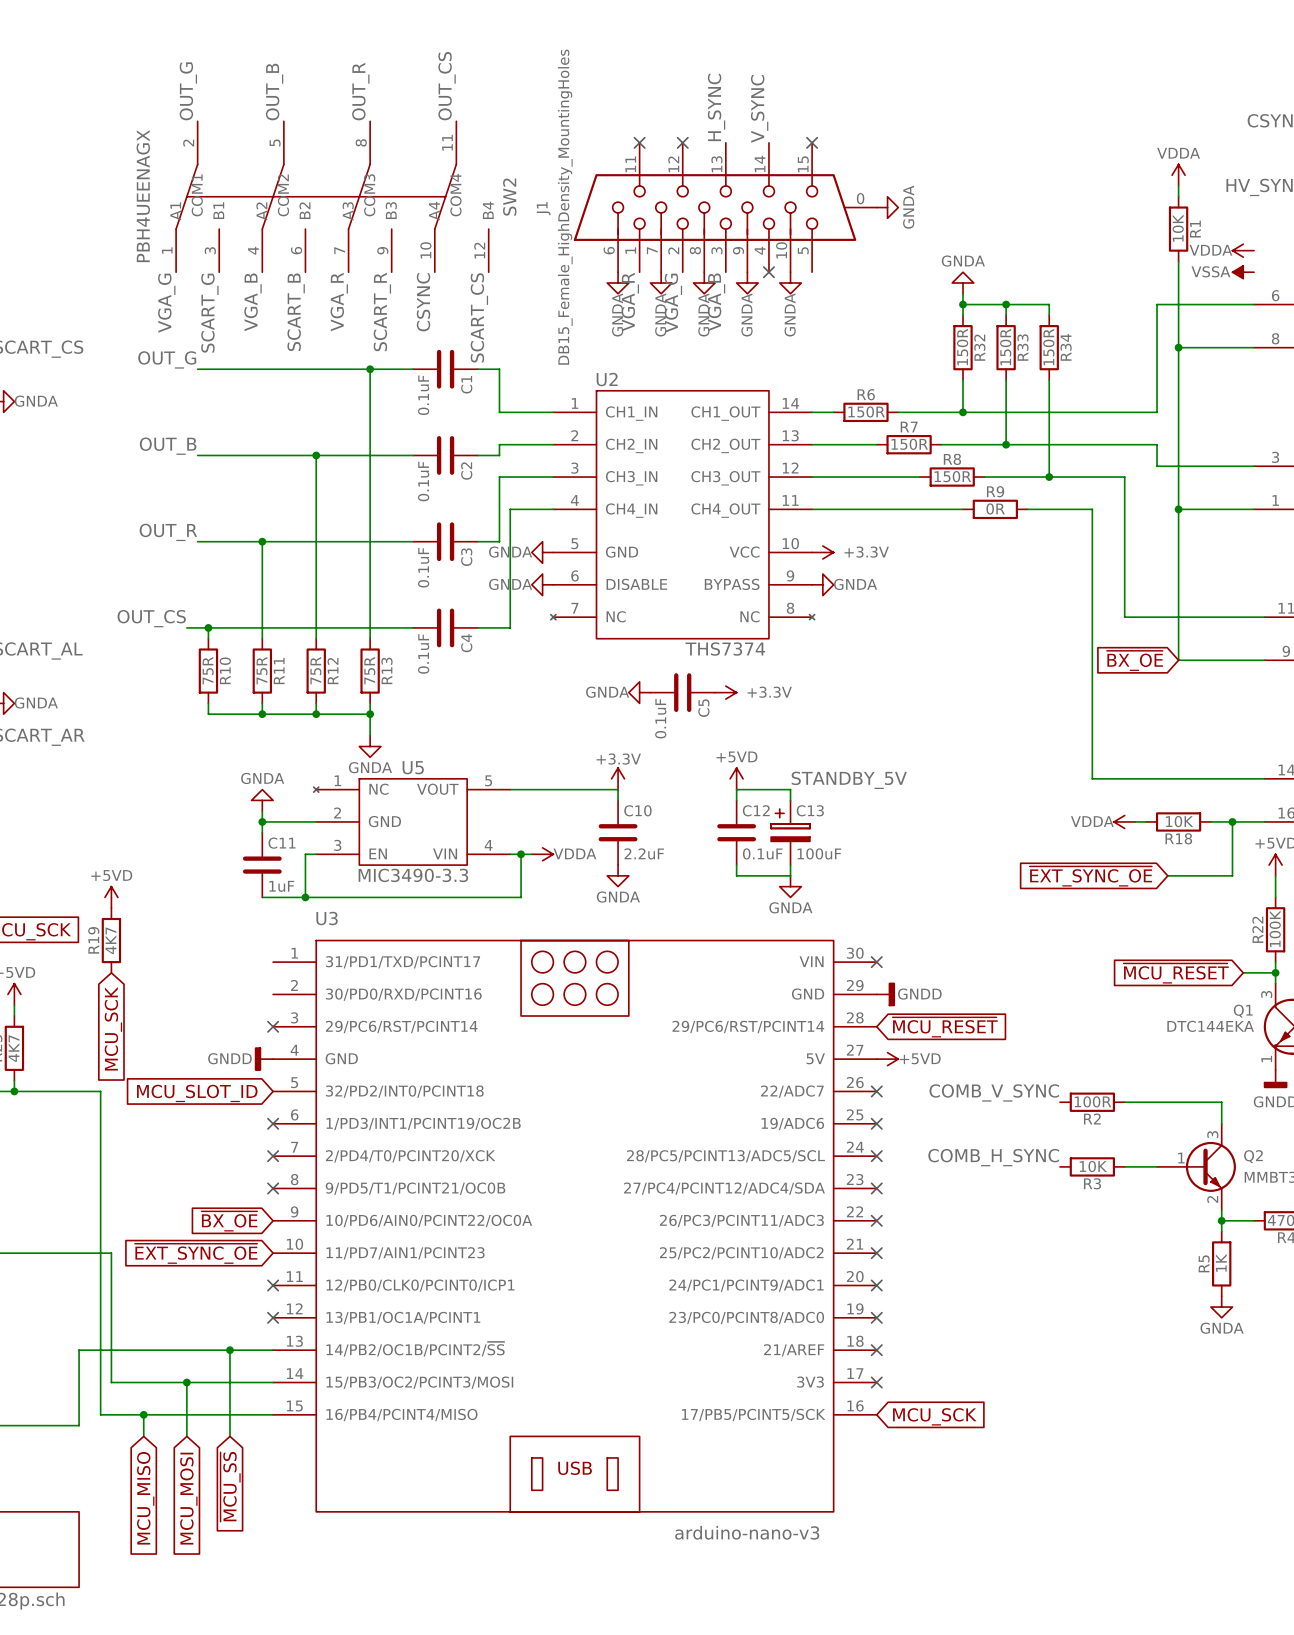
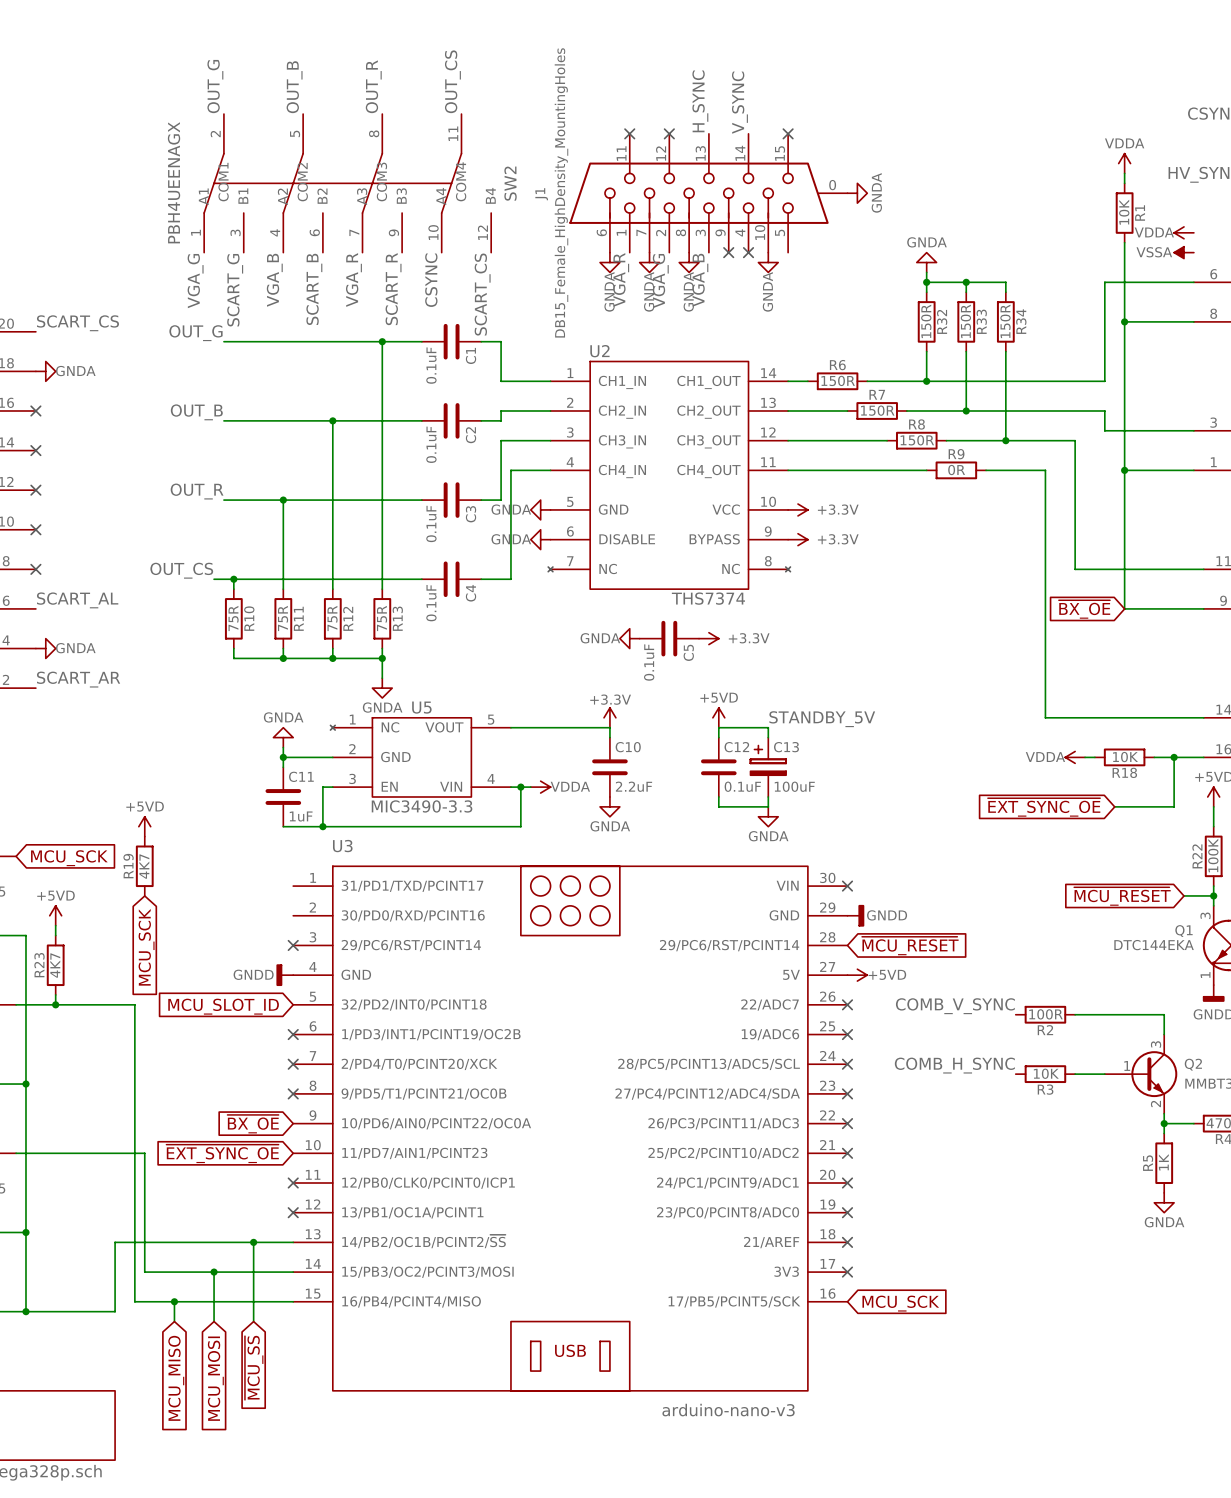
no-connect mark: none -> (728, 252)
power symbol: GNDA (747, 282) -> none
power symbol: GNDA (822, 584) -> +3.3V (798, 539)

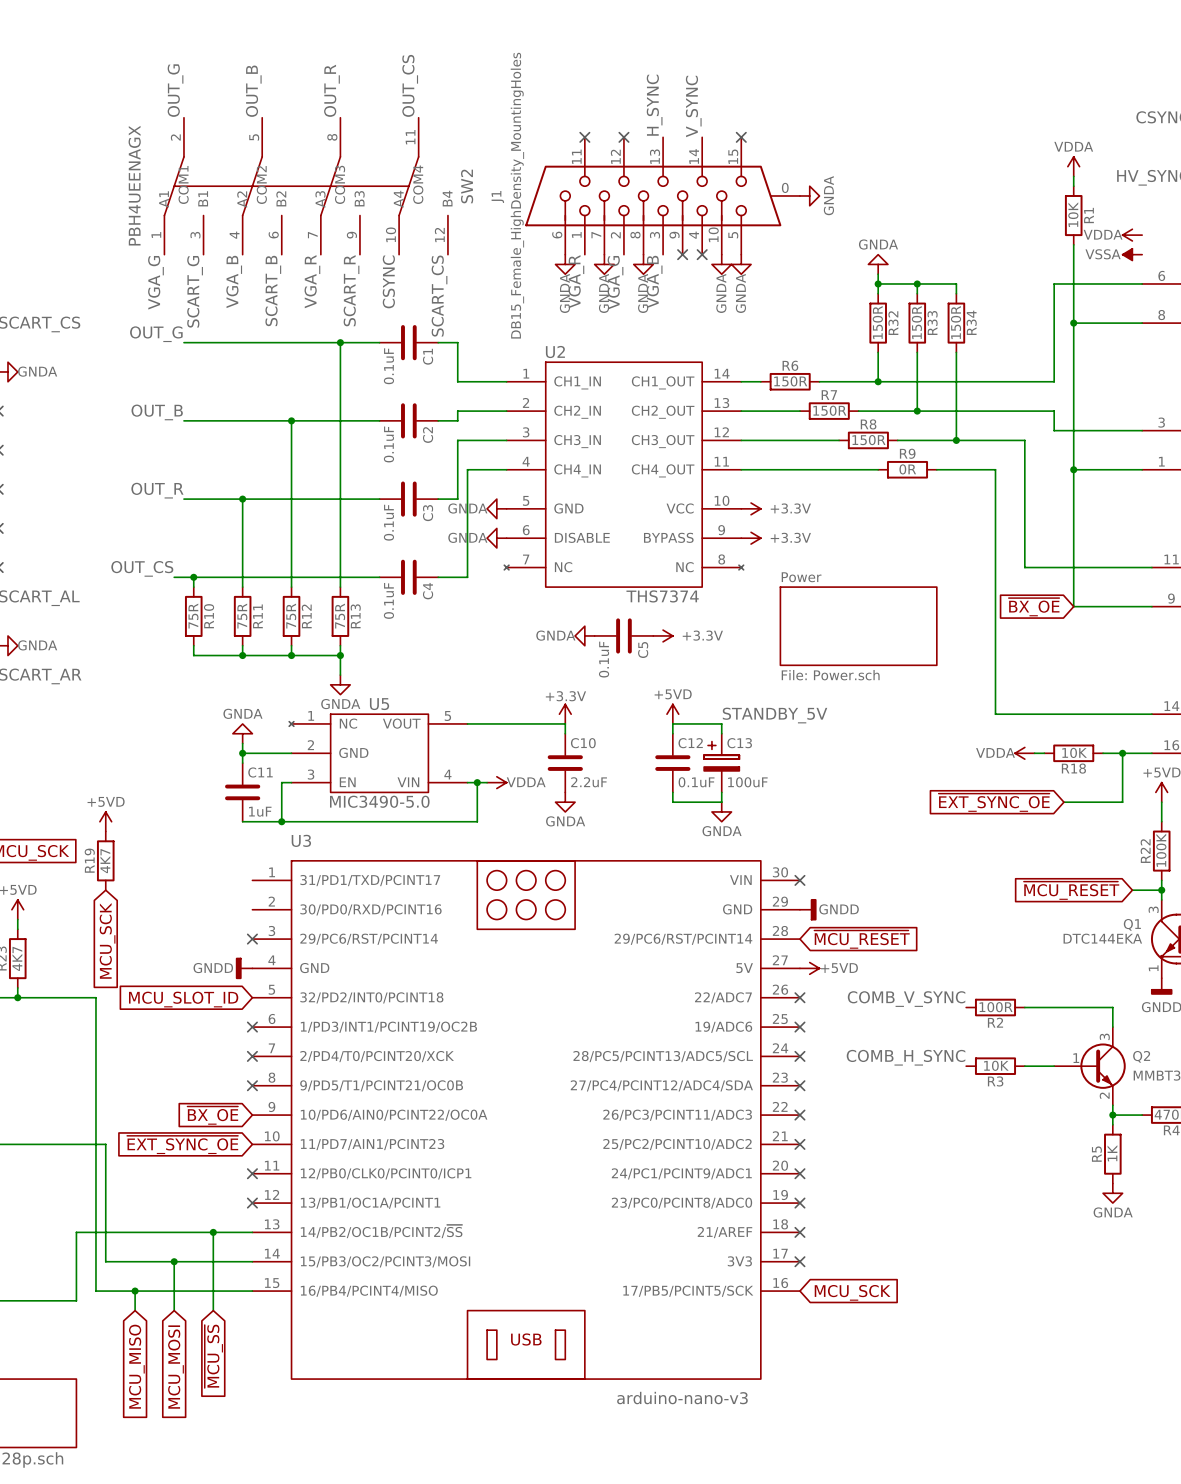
power symbol: none -> GNDA (741, 264)
sheet Power: none -> File: Power.sch (858, 626)
U5 value: MIC3490-3.3 (422, 806) -> MIC3490-5.0 (379, 801)

